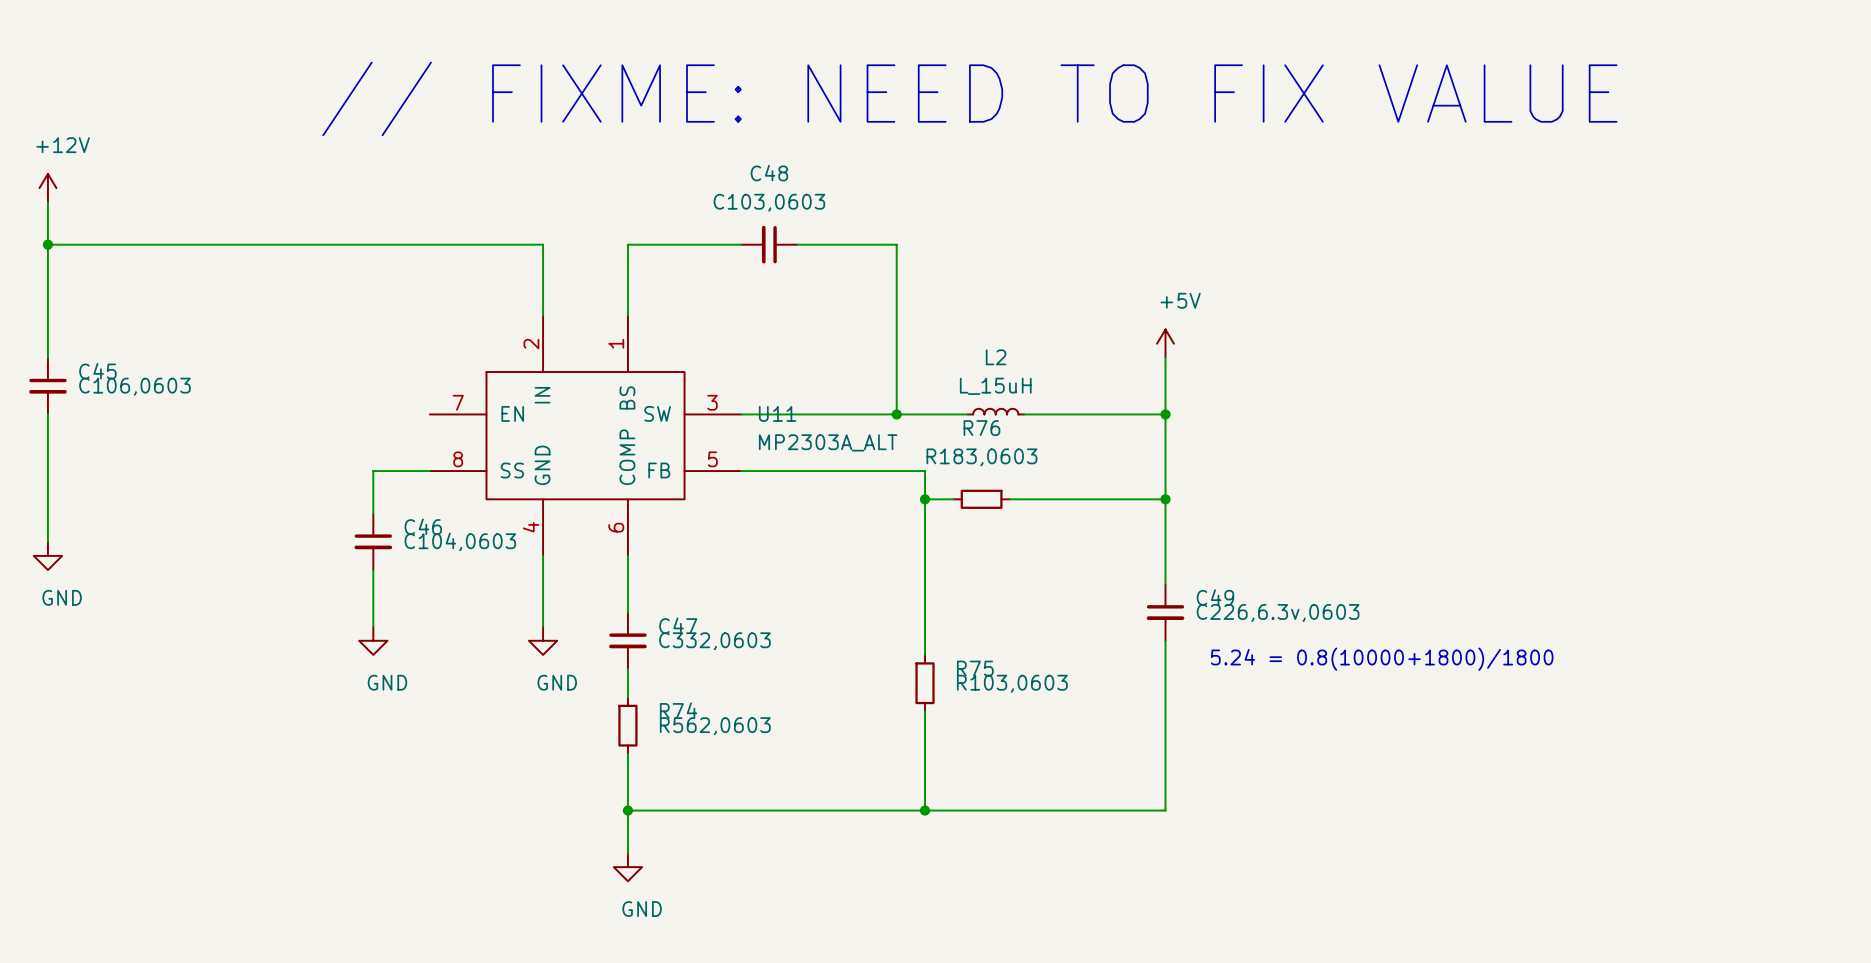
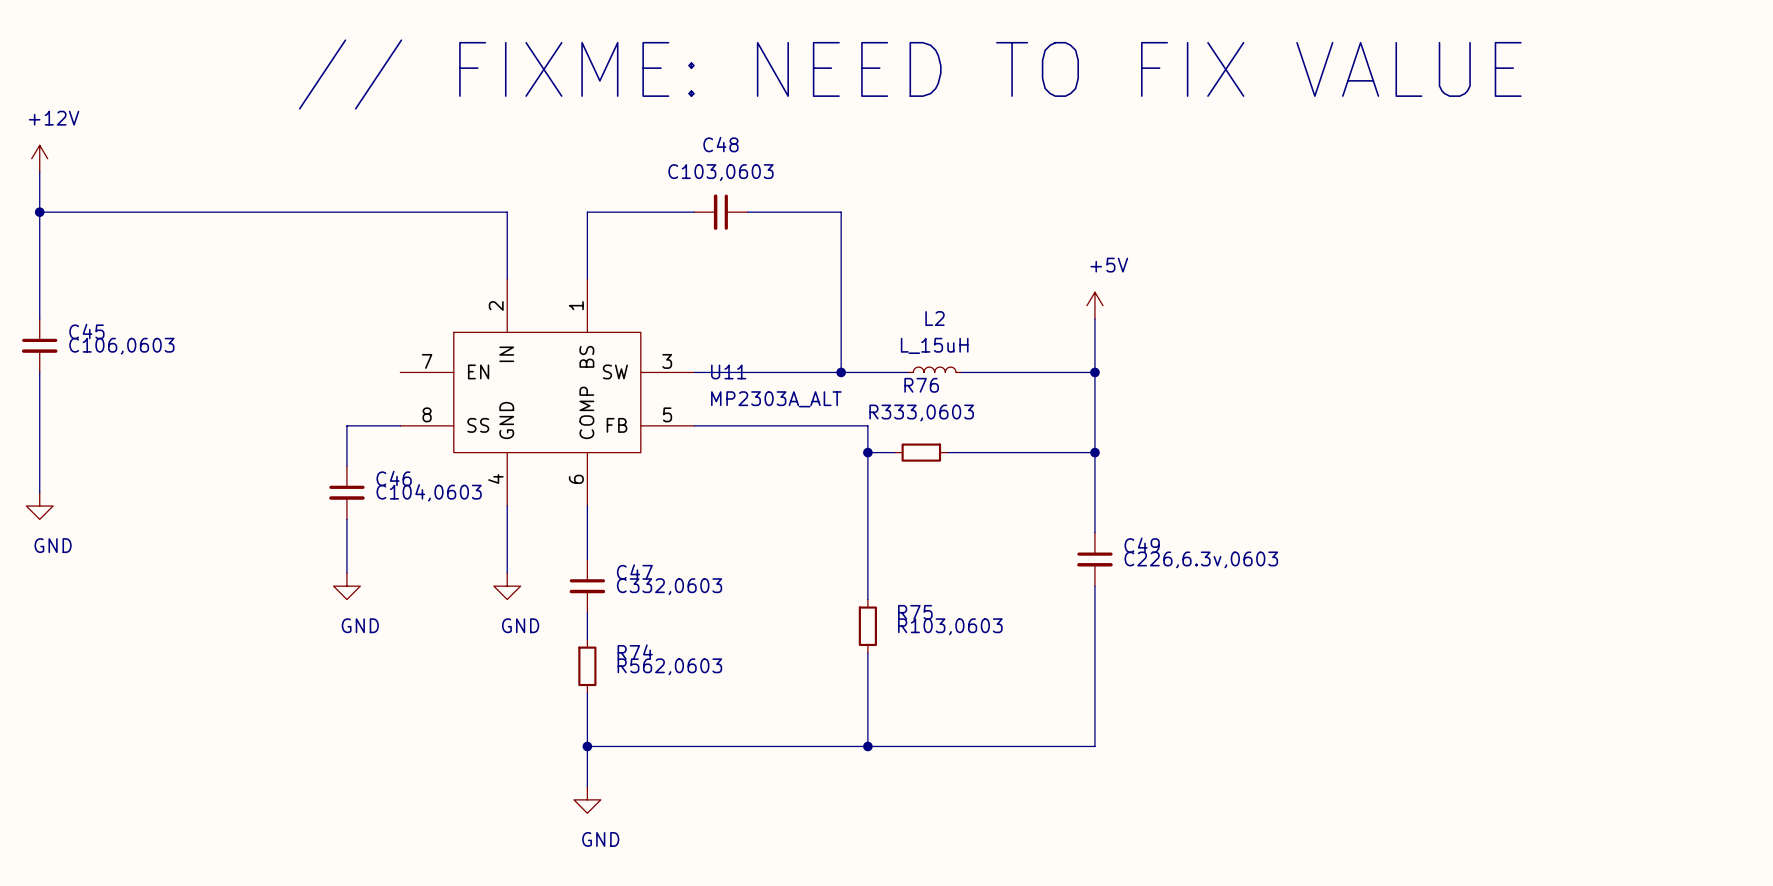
R76 value: R183,0603 (981, 457) -> R333,0603 (921, 412)
text: 5.24 = 0.8(10000+1800)/1800 (1382, 659) -> none

